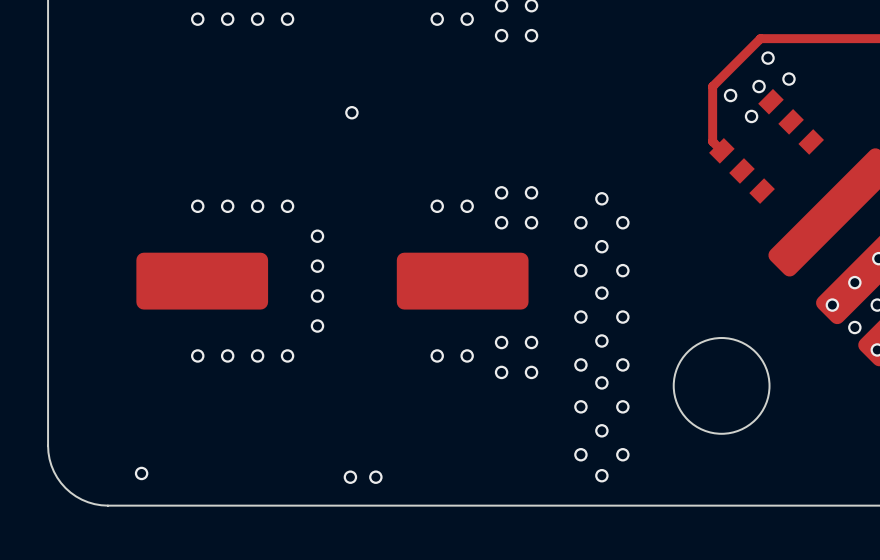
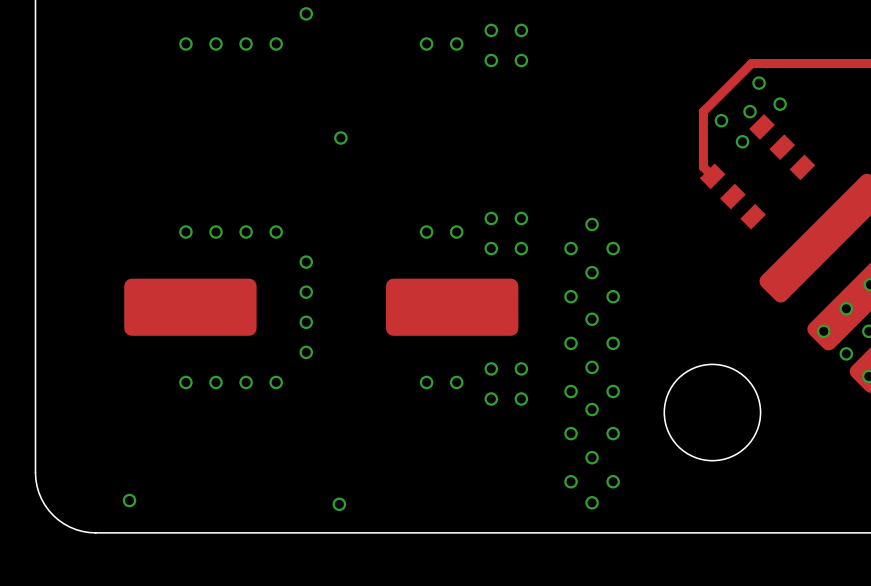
via: (375, 477) -> none

